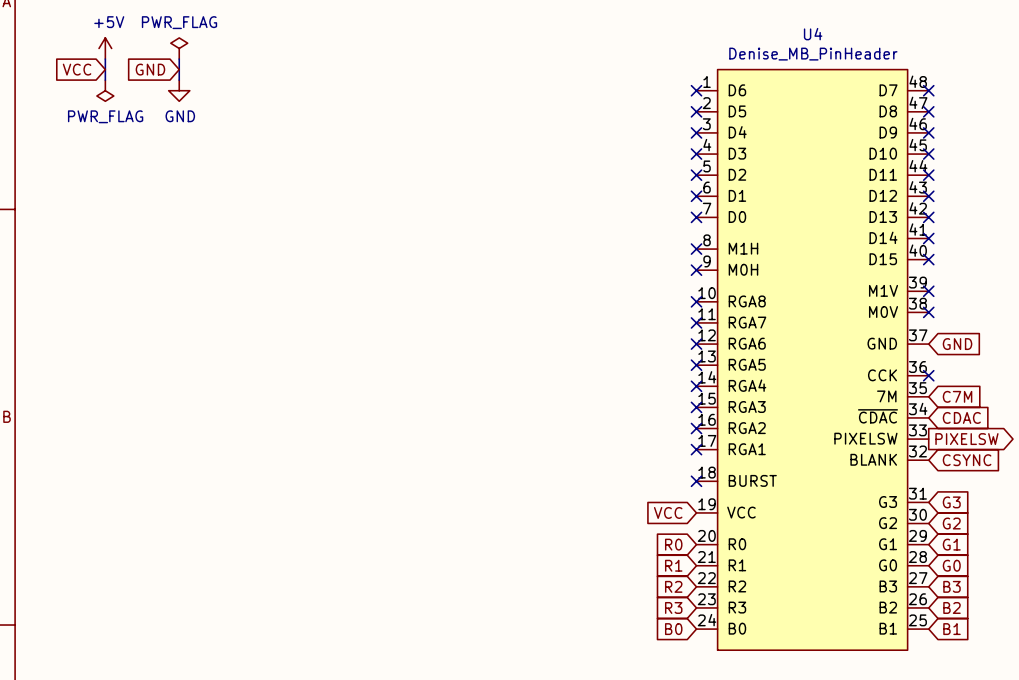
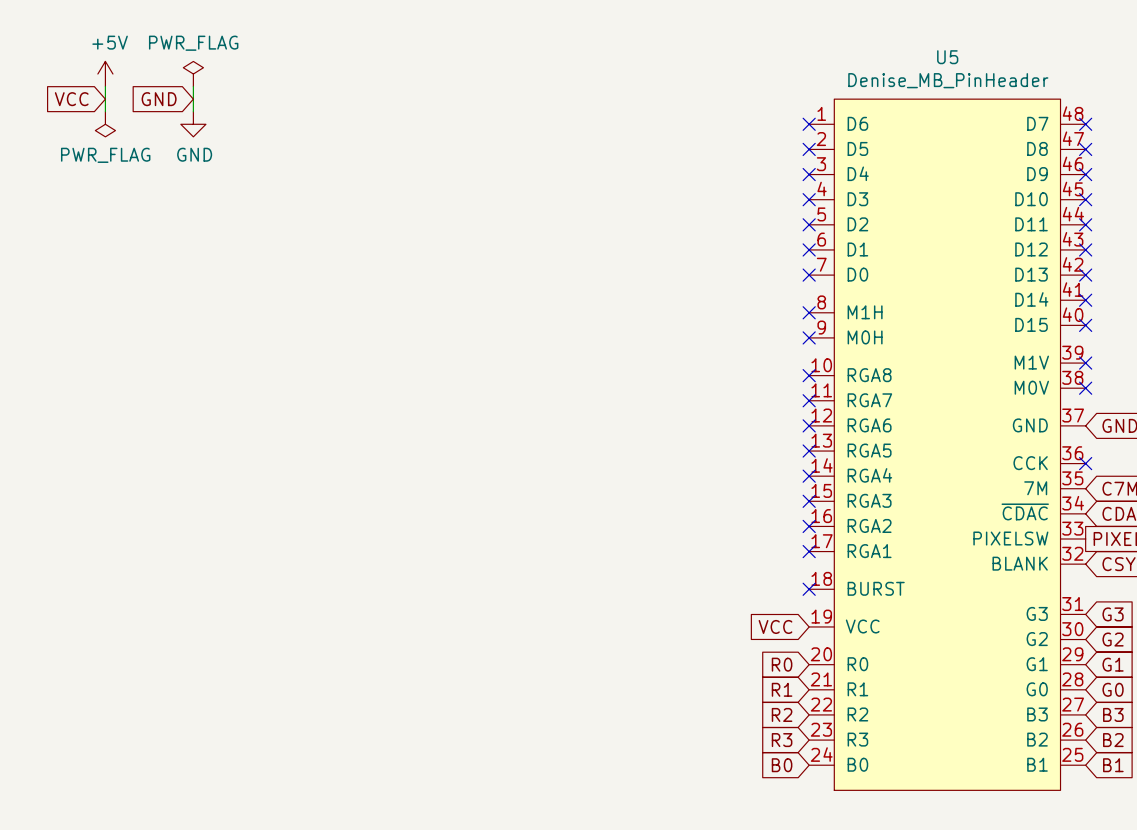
U4 name: U4 (813, 34) -> U5 (947, 57)

